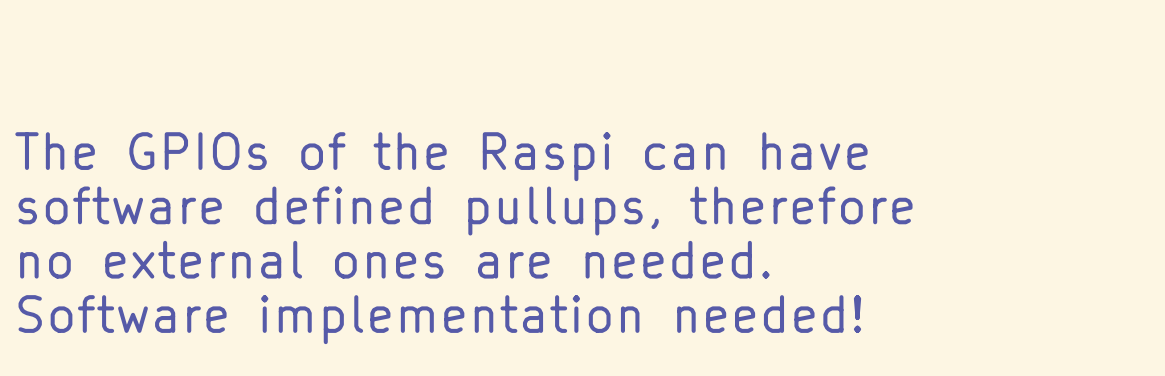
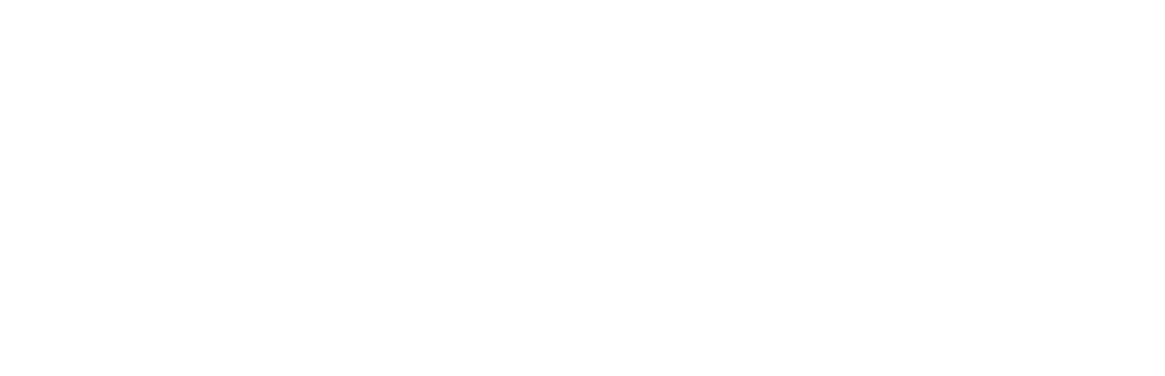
text: The GPIOs of the Raspi can have (441, 156) -> none
text: software defined pullups, therefore (465, 211) -> none
text: no external ones are needed. (394, 259) -> none
text: Software implementation needed! (439, 319) -> none

